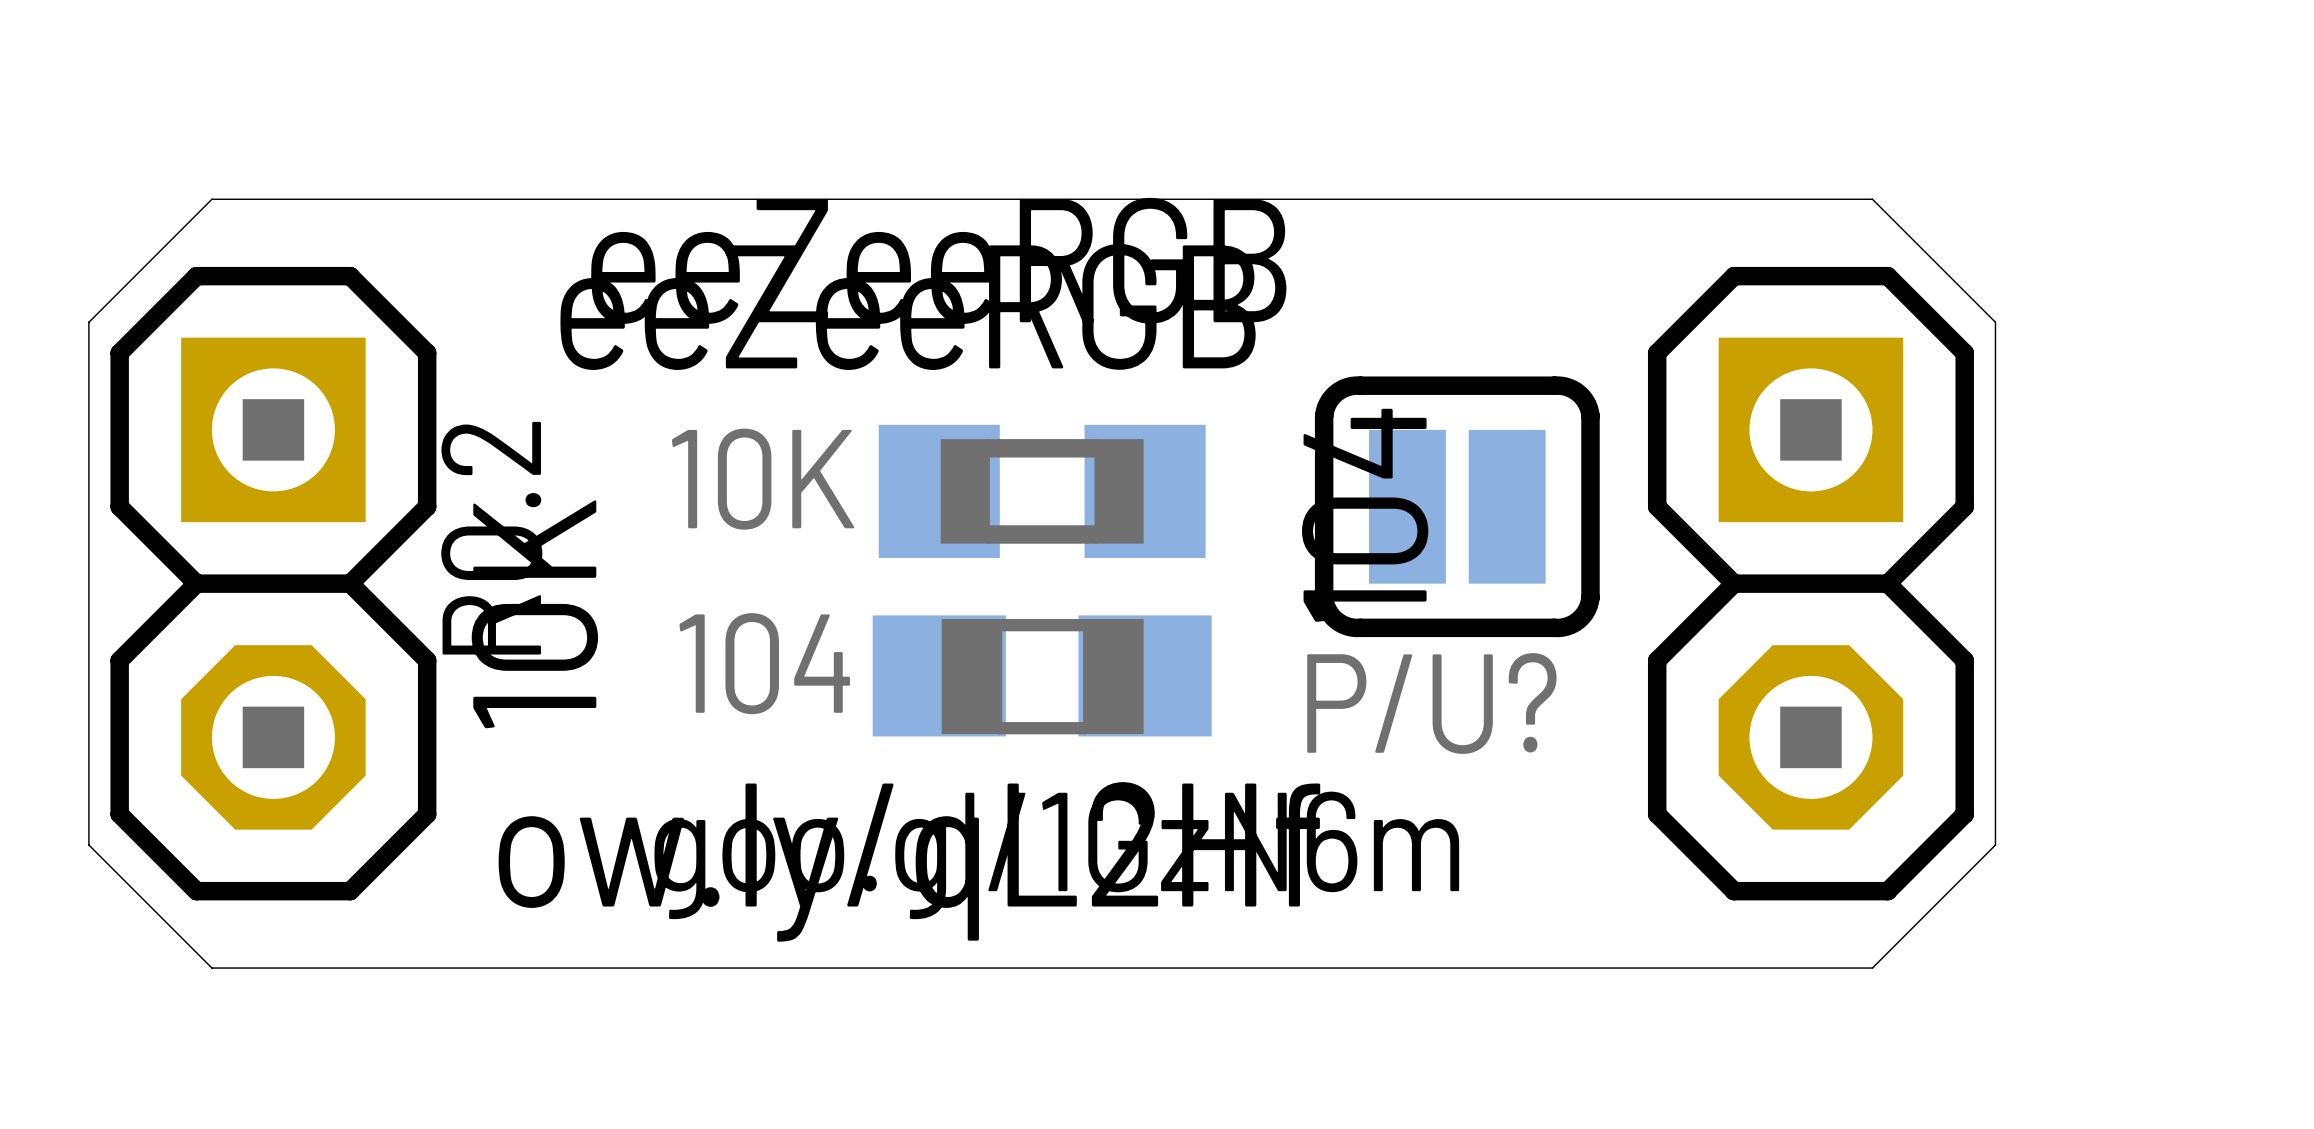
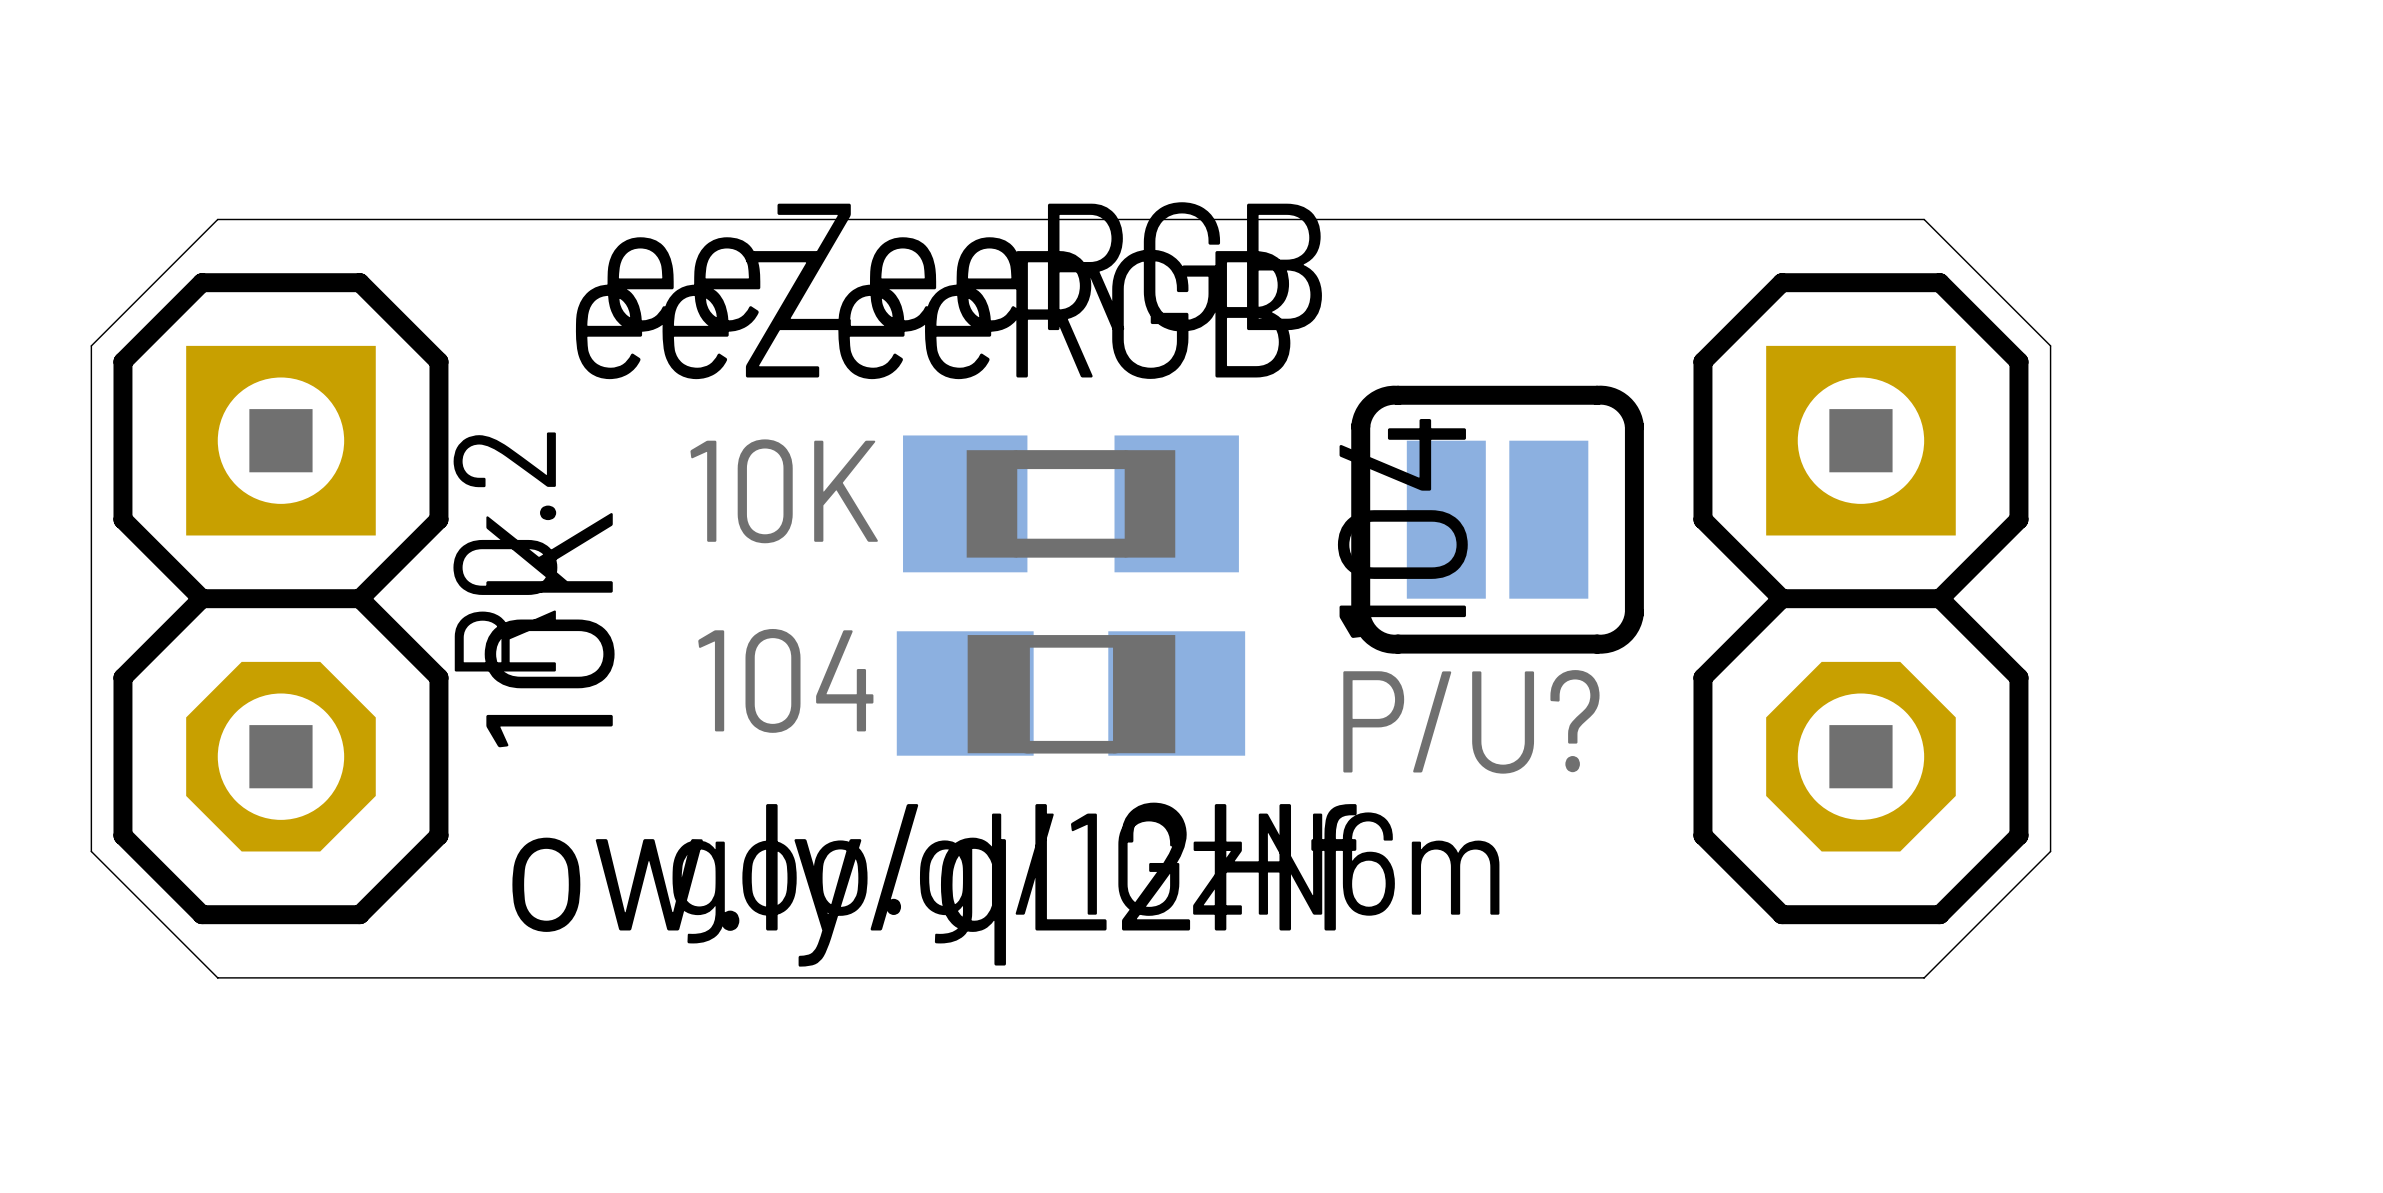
board edge: (1995, 337) (1995, 322) (1872, 199) (211, 199) (88, 322) (88, 337) -> (2050, 345) (1924, 219) (217, 219) (91, 345)
board edge: (1995, 829) (1995, 845) (1872, 968) (211, 968) (88, 845) (88, 829) -> (2050, 851) (1924, 977) (217, 977) (91, 851)

